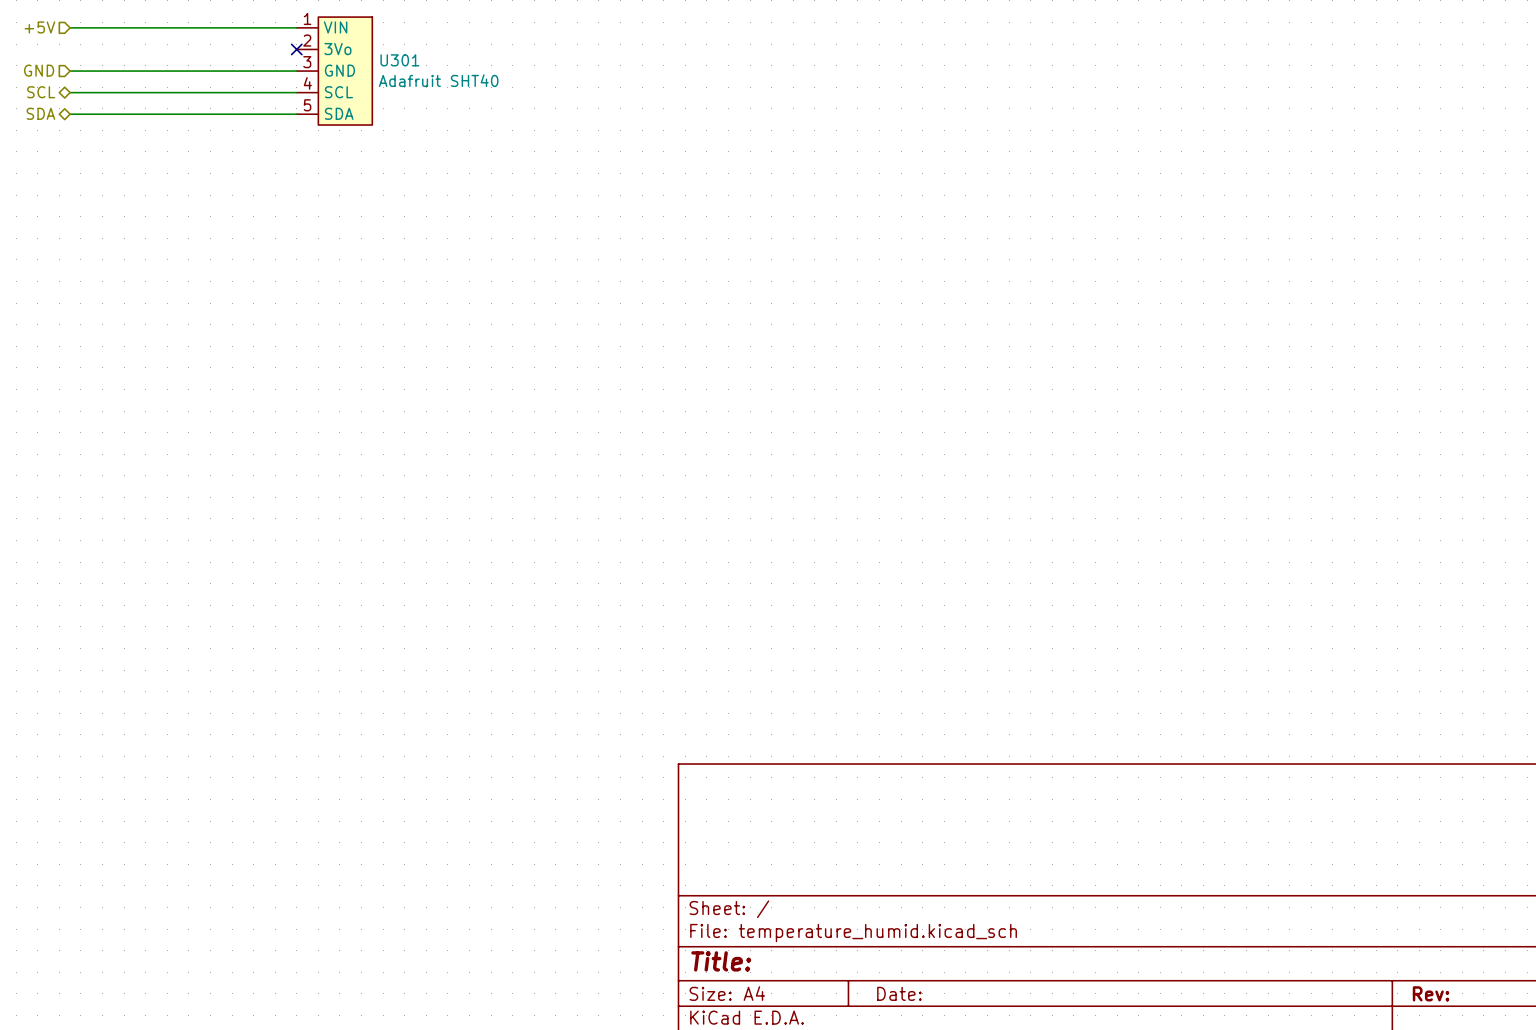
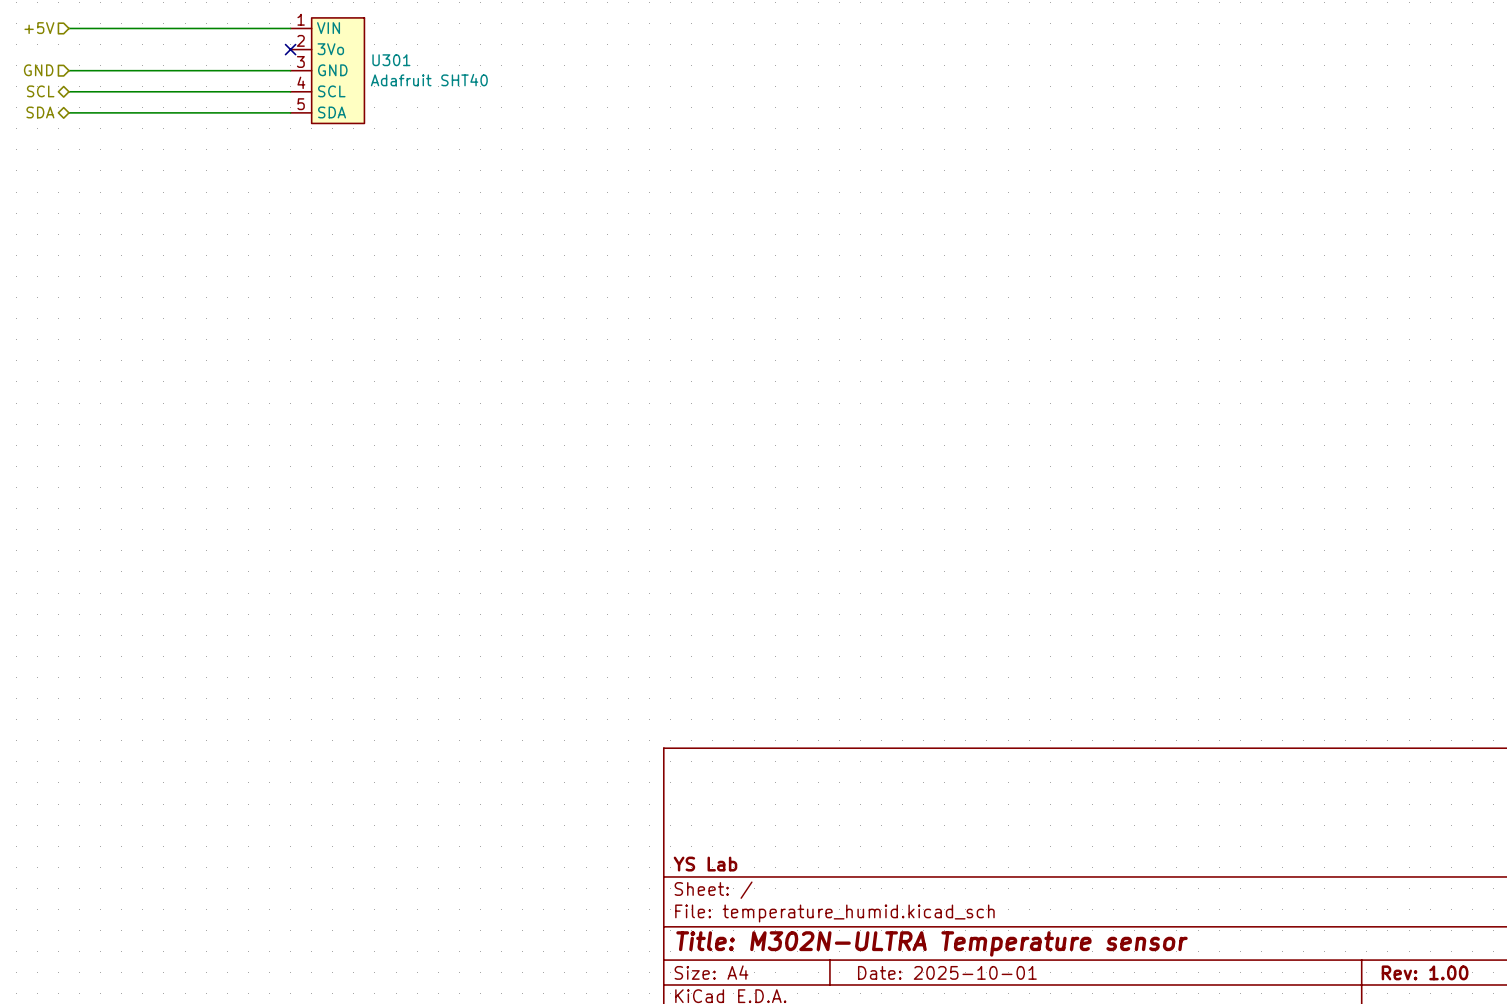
title block: none -> YS Lab (705, 864)
title block: Title: (721, 961) -> Title: M302N-ULTRA Temperature sensor (931, 943)
title block: Date: (899, 993) -> Date: 2025-10-01 (947, 972)
title block: Rev: (1431, 993) -> Rev: 1.00 (1425, 972)

